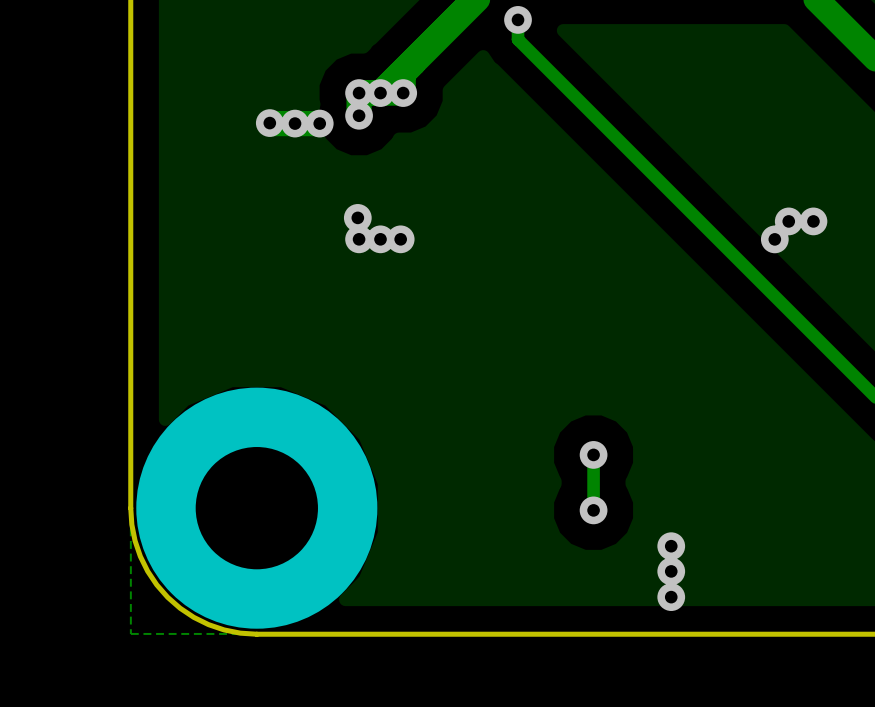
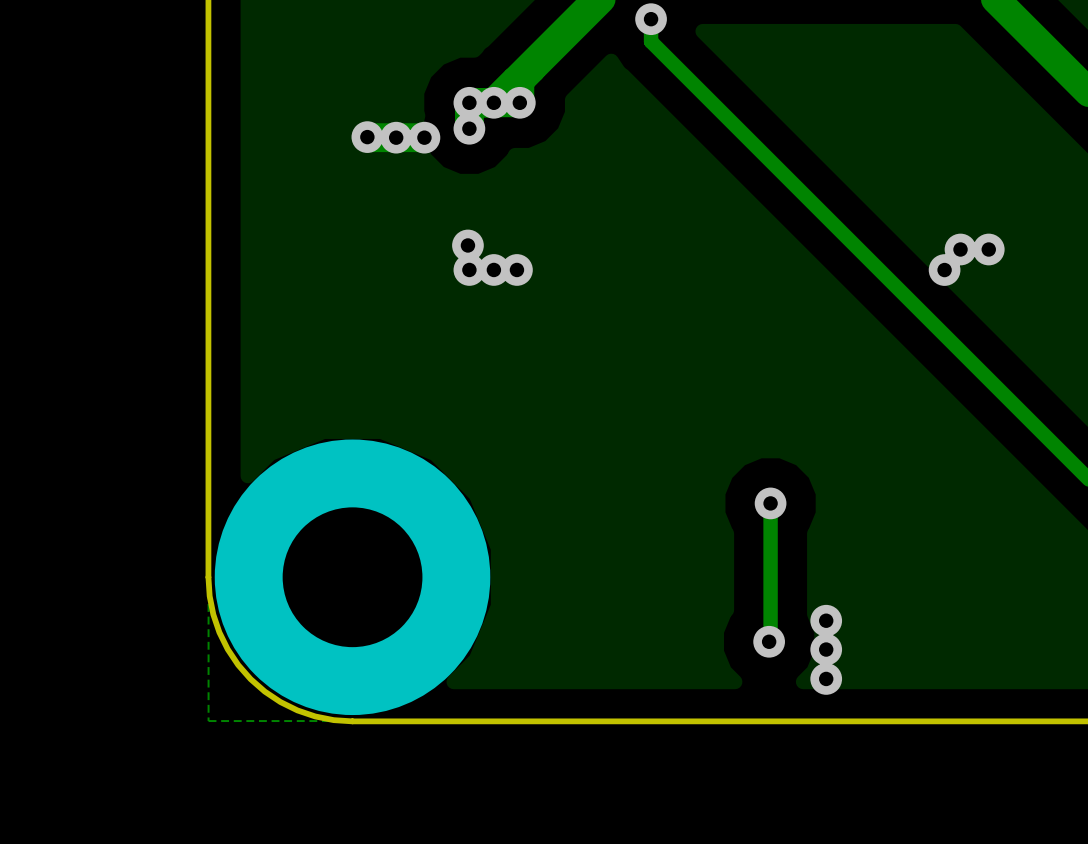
track: none -> (770, 503) (770, 647) (769, 641)
track: (593, 454) (593, 510) -> none
via position: (593, 454) -> (770, 503)
via: (593, 510) -> none
via: none -> (769, 641)

